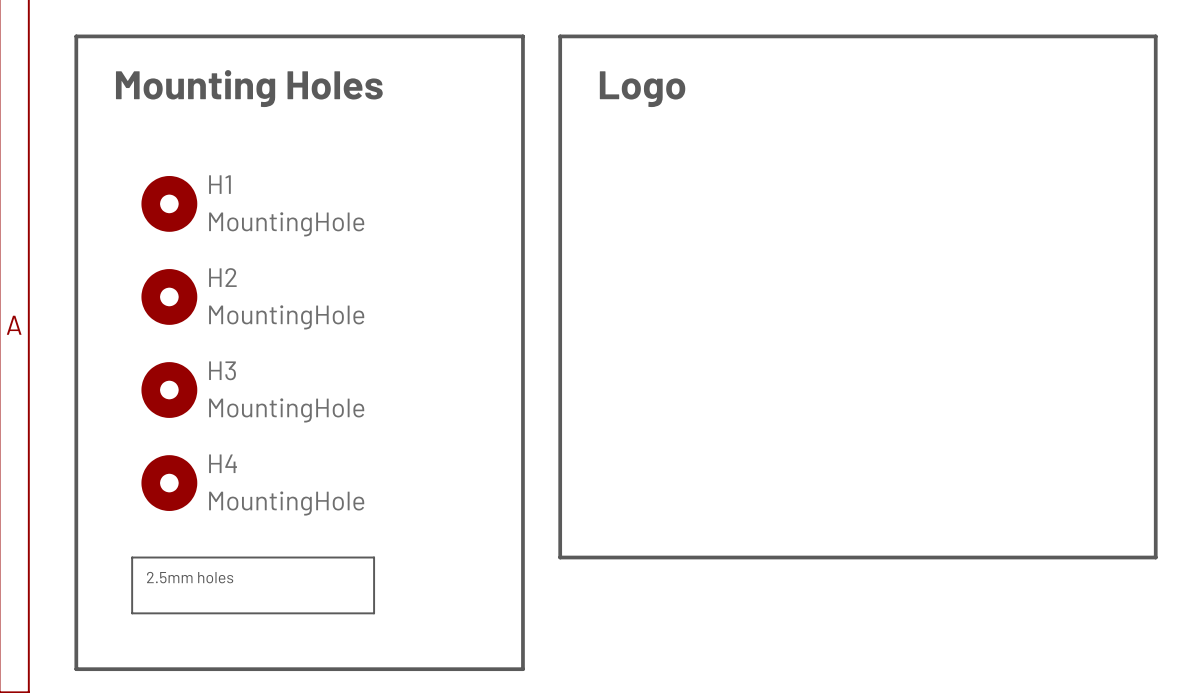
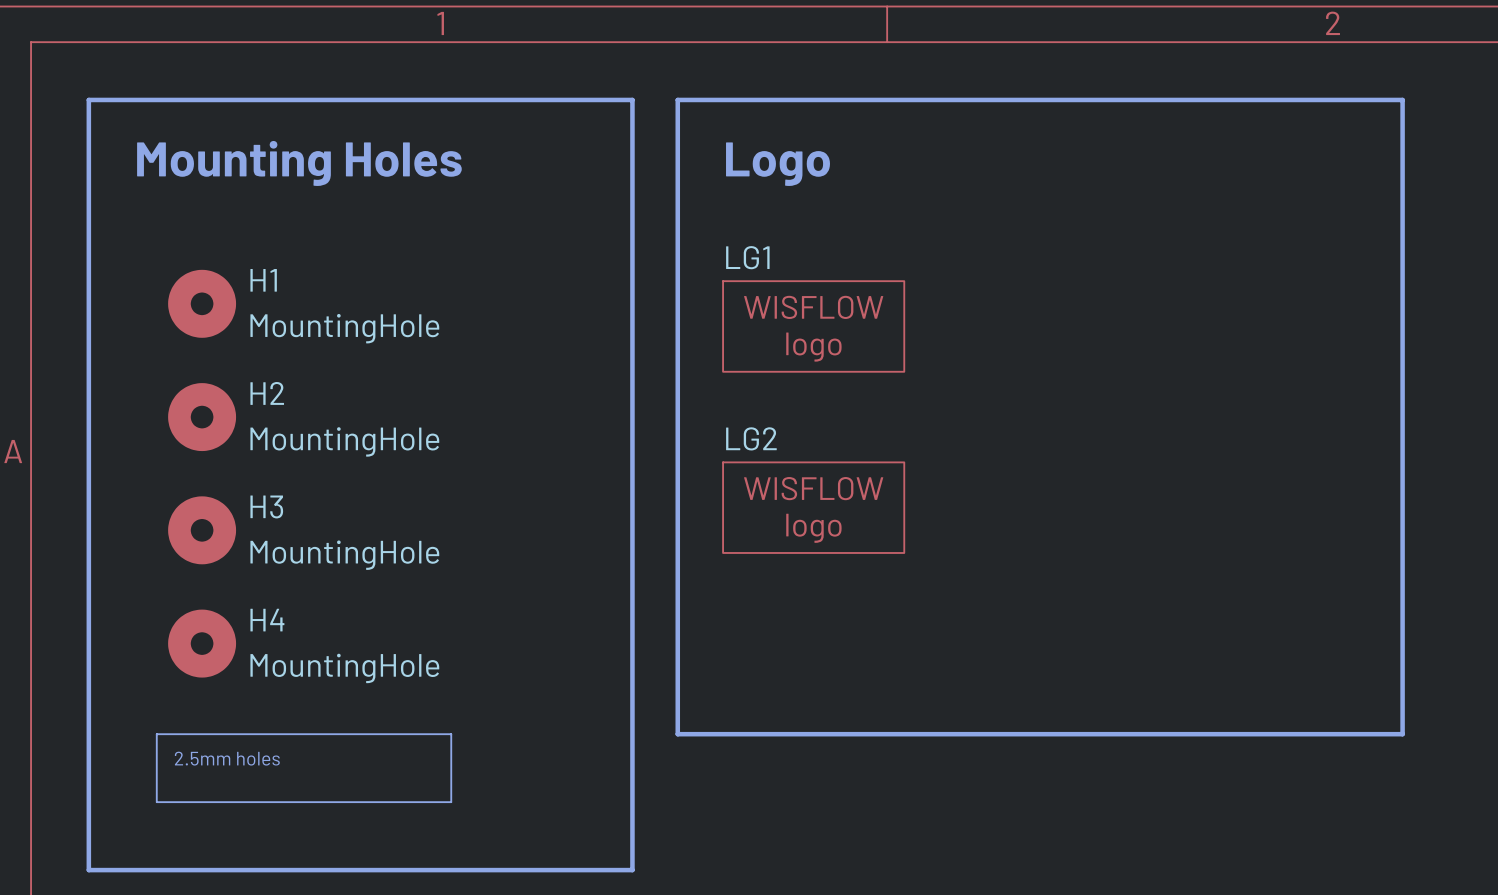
LG1: none -> (813, 326)
LG2: none -> (813, 507)

